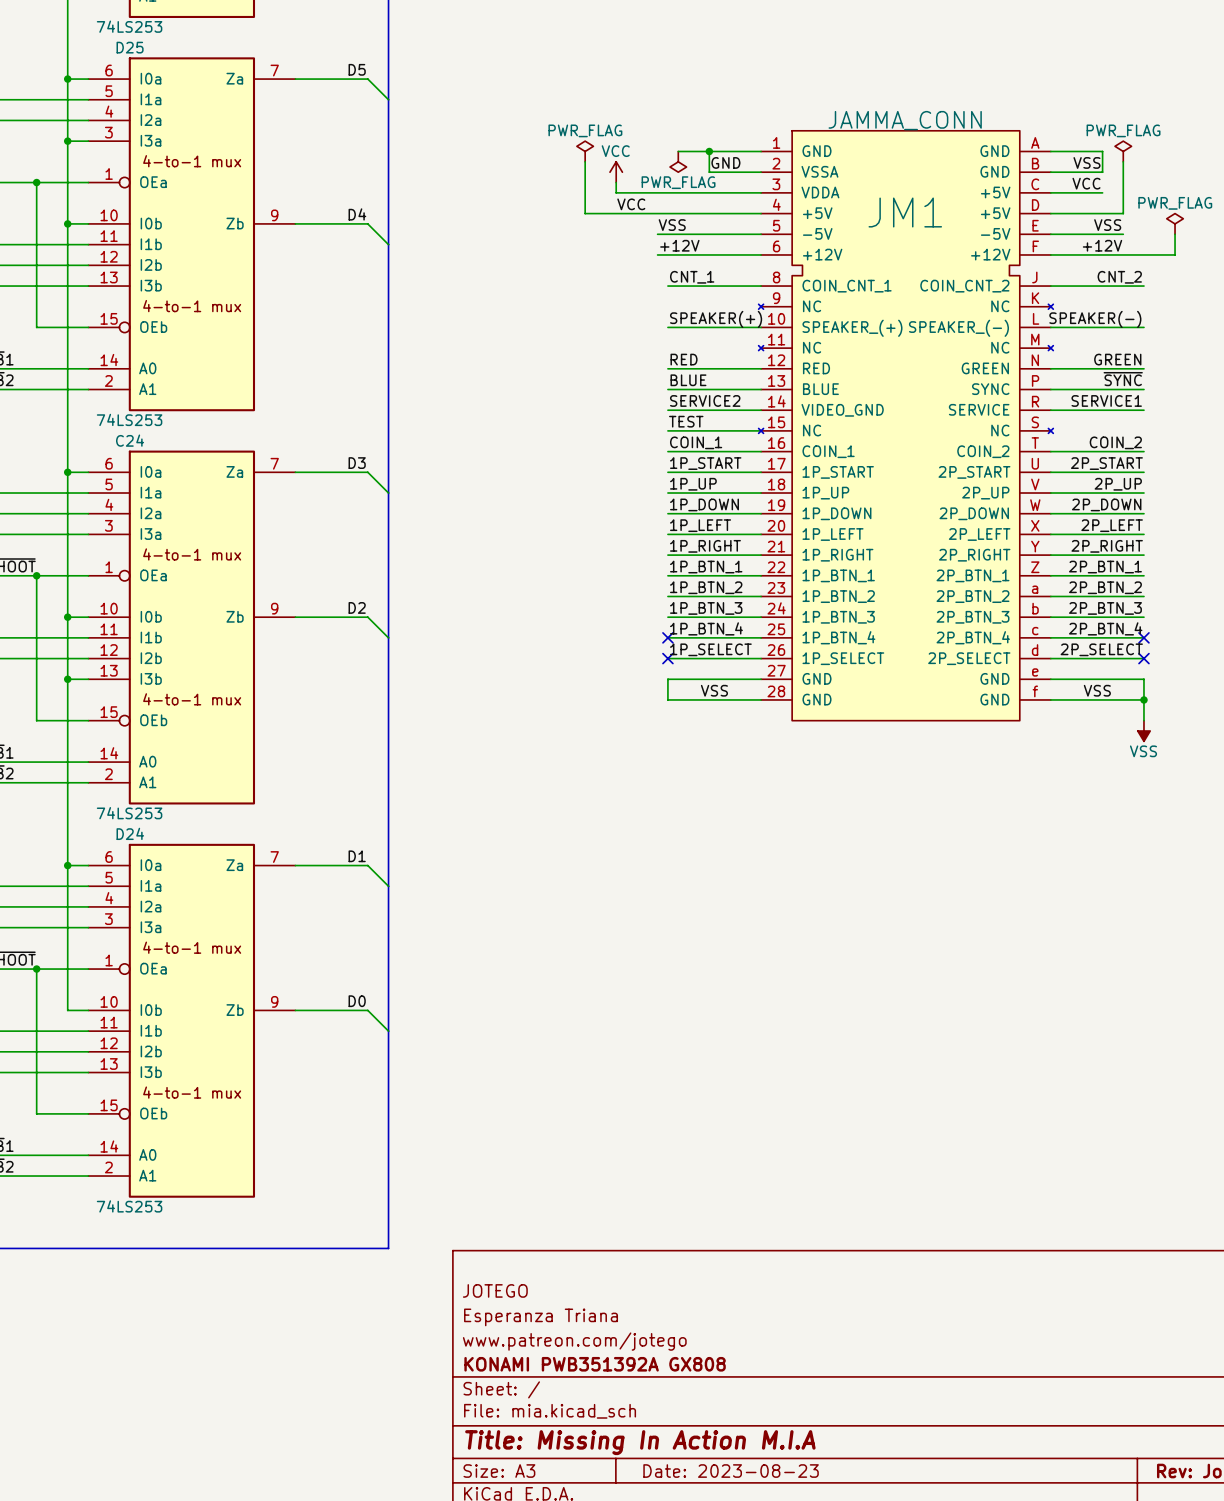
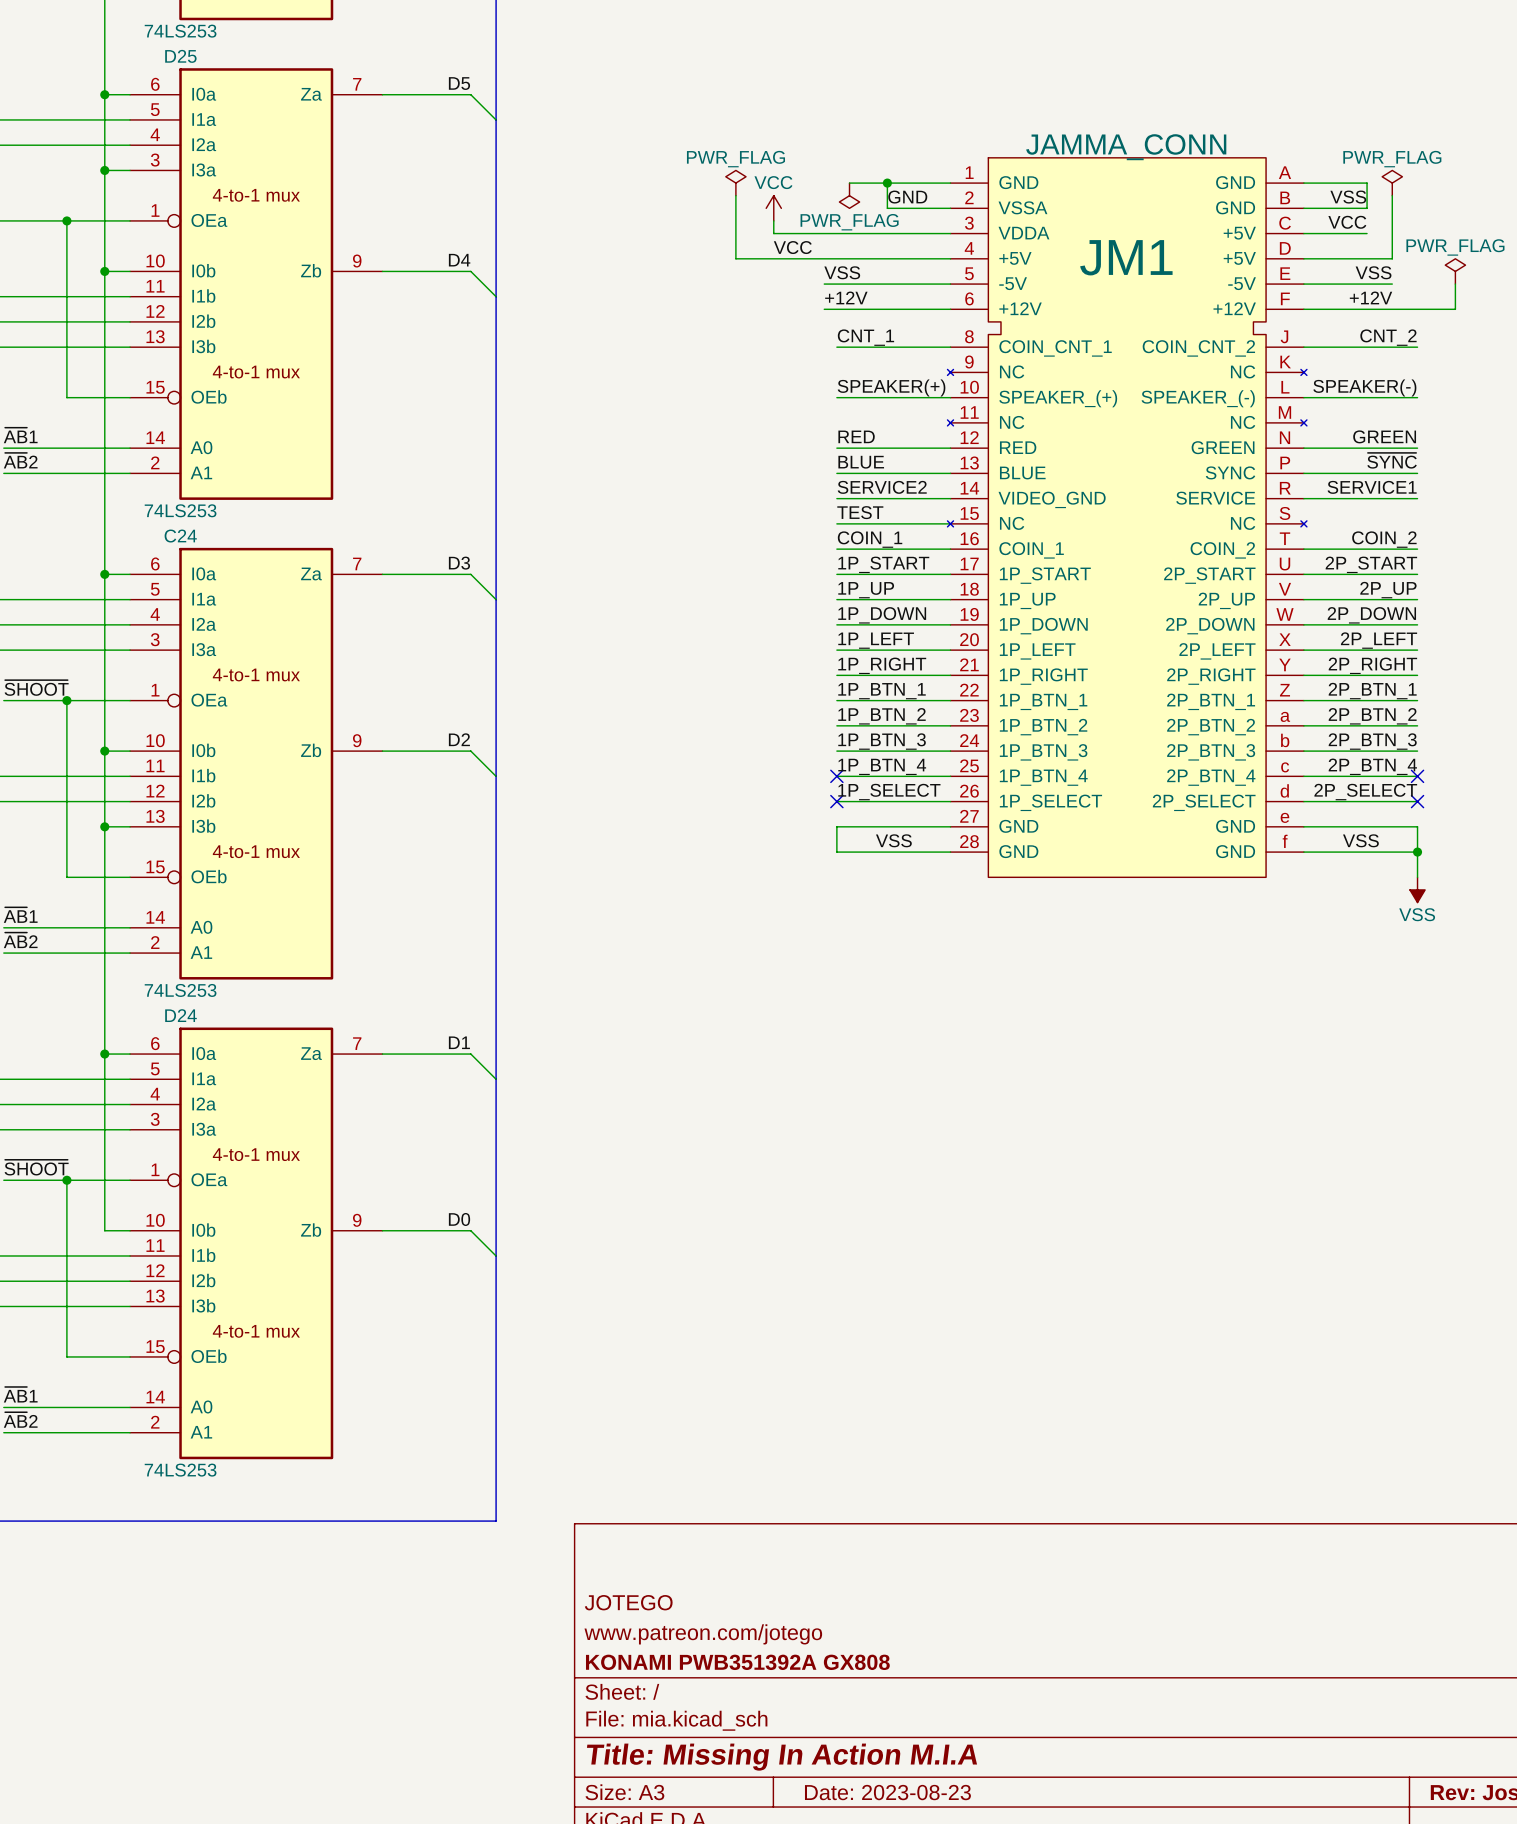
title block: JOTEGO (495, 1290) -> none
title block: Esperanza Triana (541, 1317) -> JOTEGO (628, 1602)

